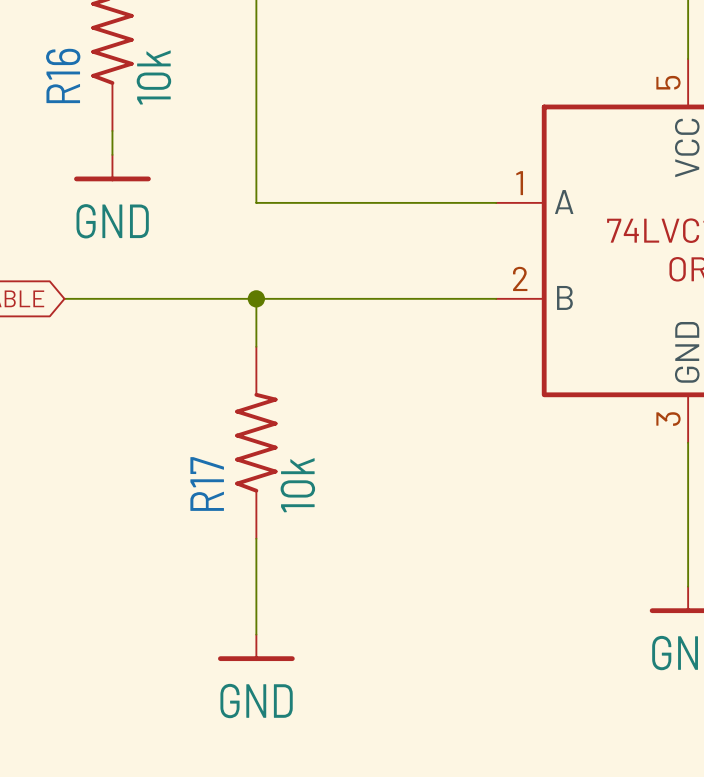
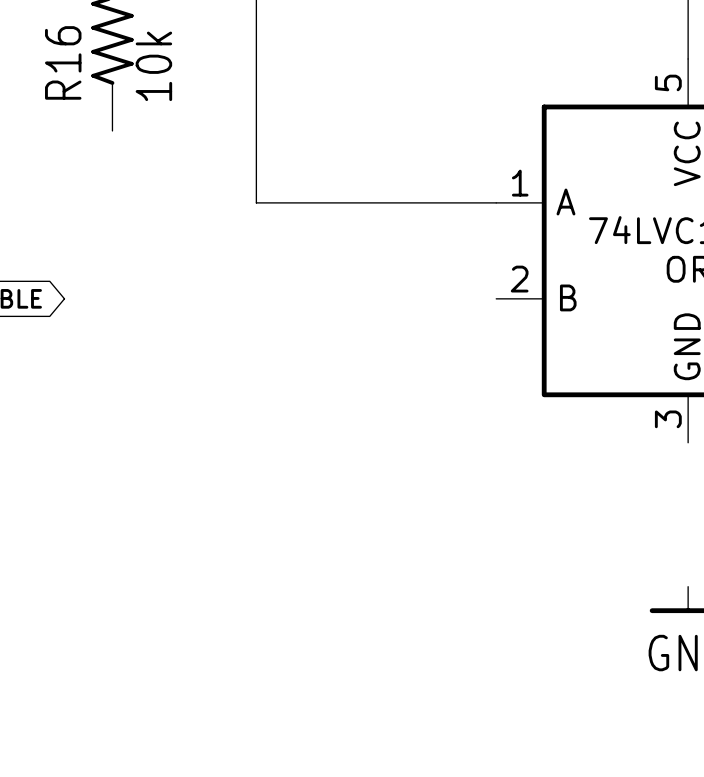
wire: (112, 130) (112, 154) -> none
power symbol: GND (112, 168) -> none
wire: (64, 298) (496, 298) -> none
wire: (256, 298) (256, 346) -> none
junction: (256, 298) -> none
R17: 10k (256, 442) -> none
wire: (688, 442) (688, 586) -> none
wire: (256, 538) (256, 634) -> none
power symbol: GND (256, 647) -> none

